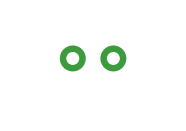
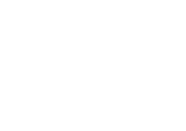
part: (93, 58) -> none

